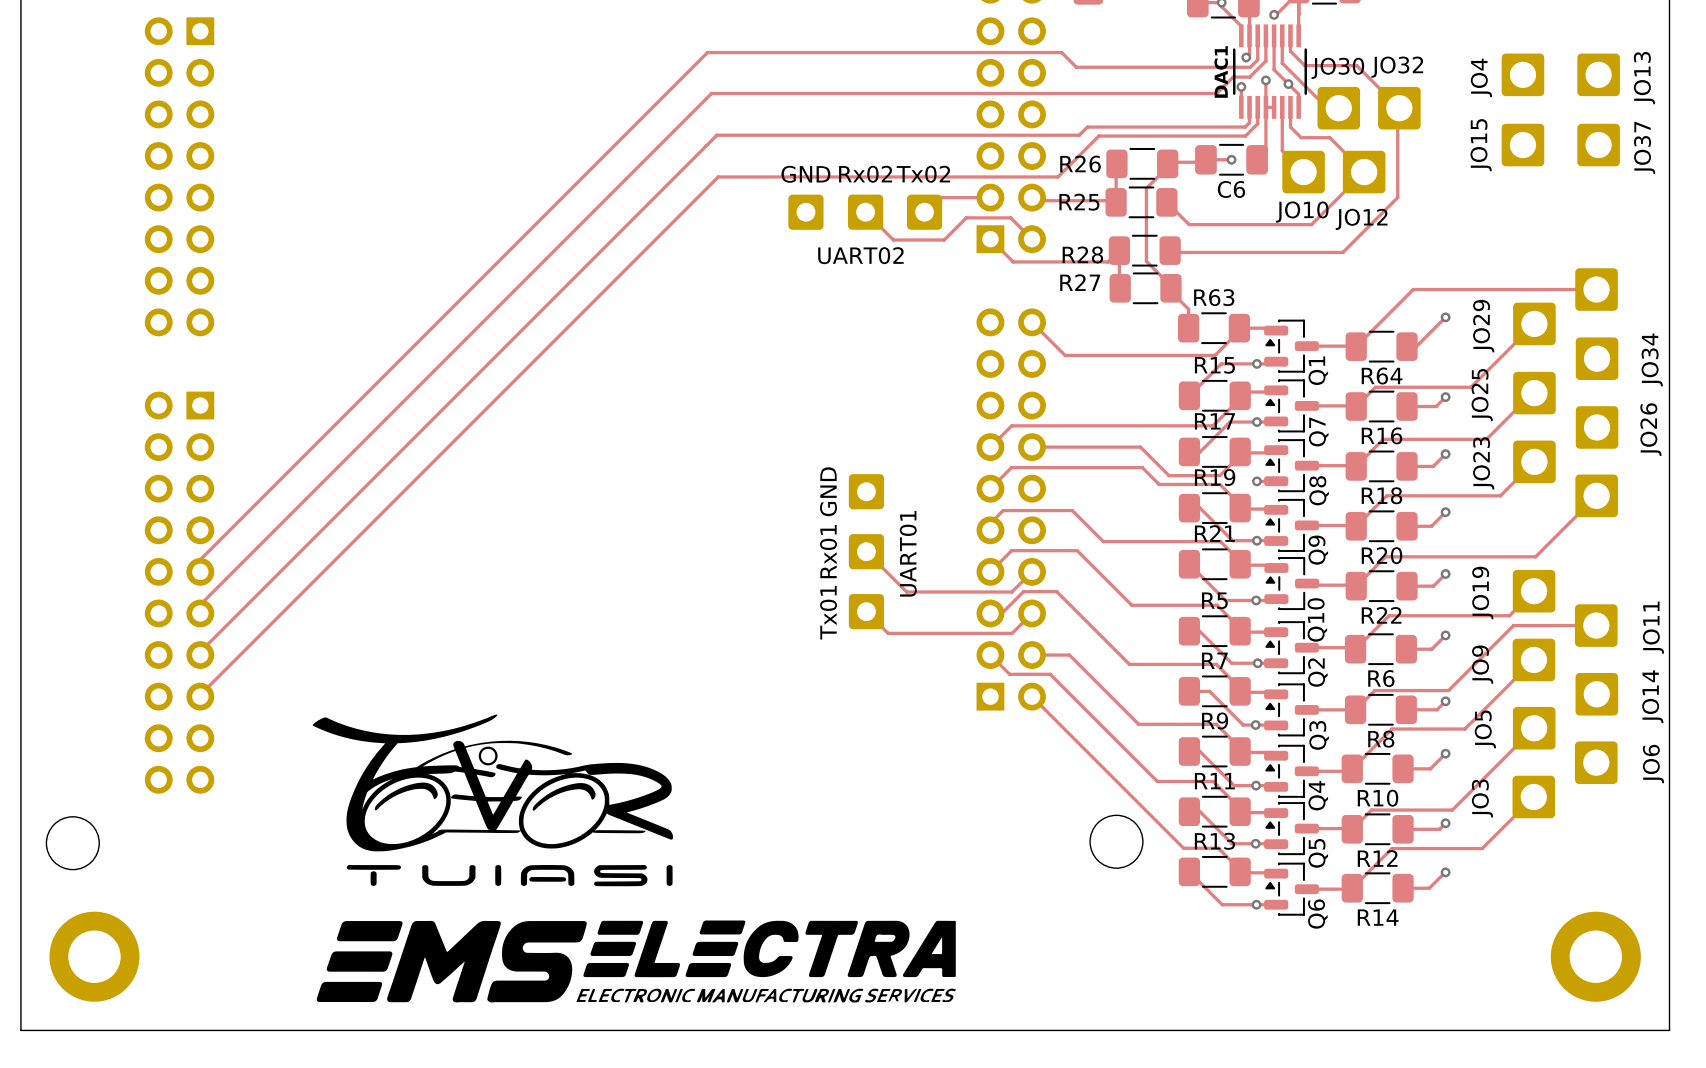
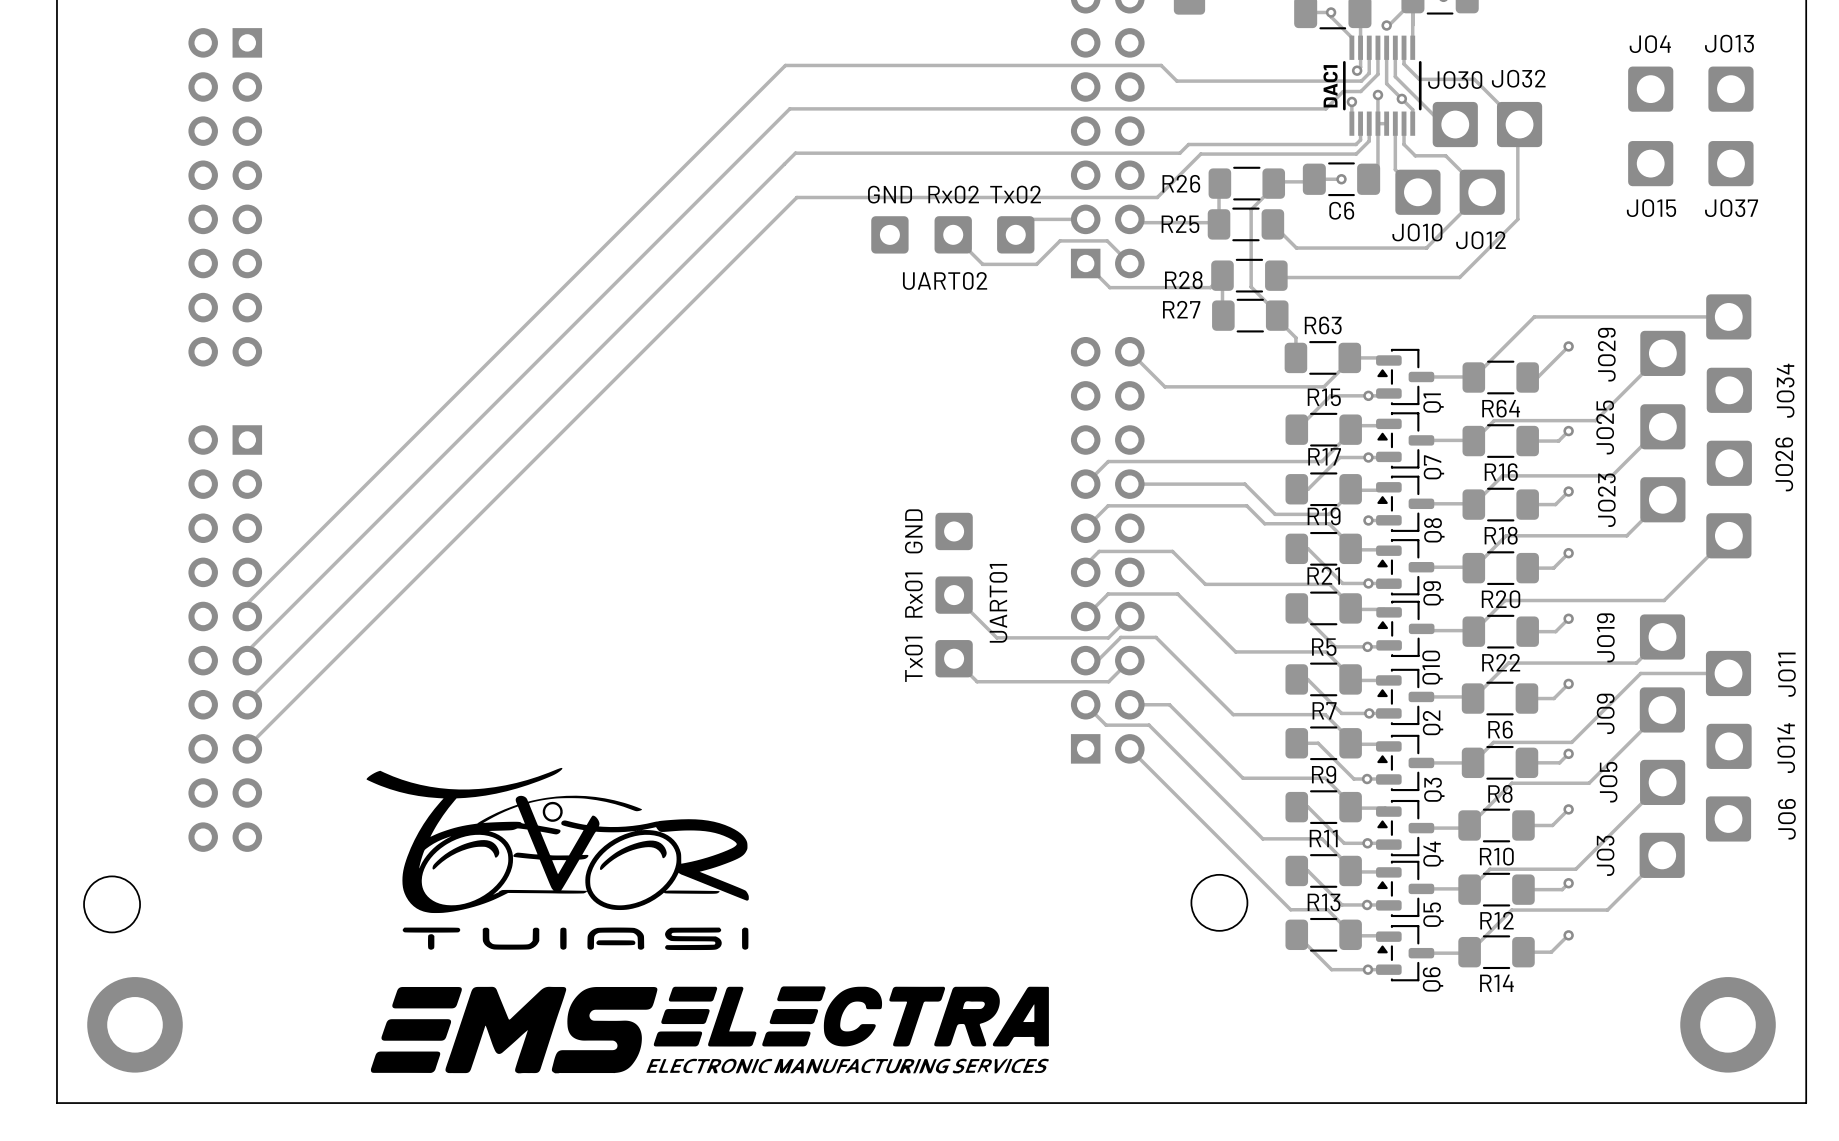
JO4 name rotation: 0° (1481, 77) -> 90° clockwise (1650, 44)
JO4 name position: JO4 (1481, 77) -> JO4 (1650, 44)
JO13 name rotation: 0° (1644, 78) -> 90° clockwise (1729, 43)
JO15 name rotation: 0° (1481, 145) -> 90° clockwise (1651, 208)
JO37 name rotation: 0° (1644, 147) -> 90° clockwise (1731, 208)

